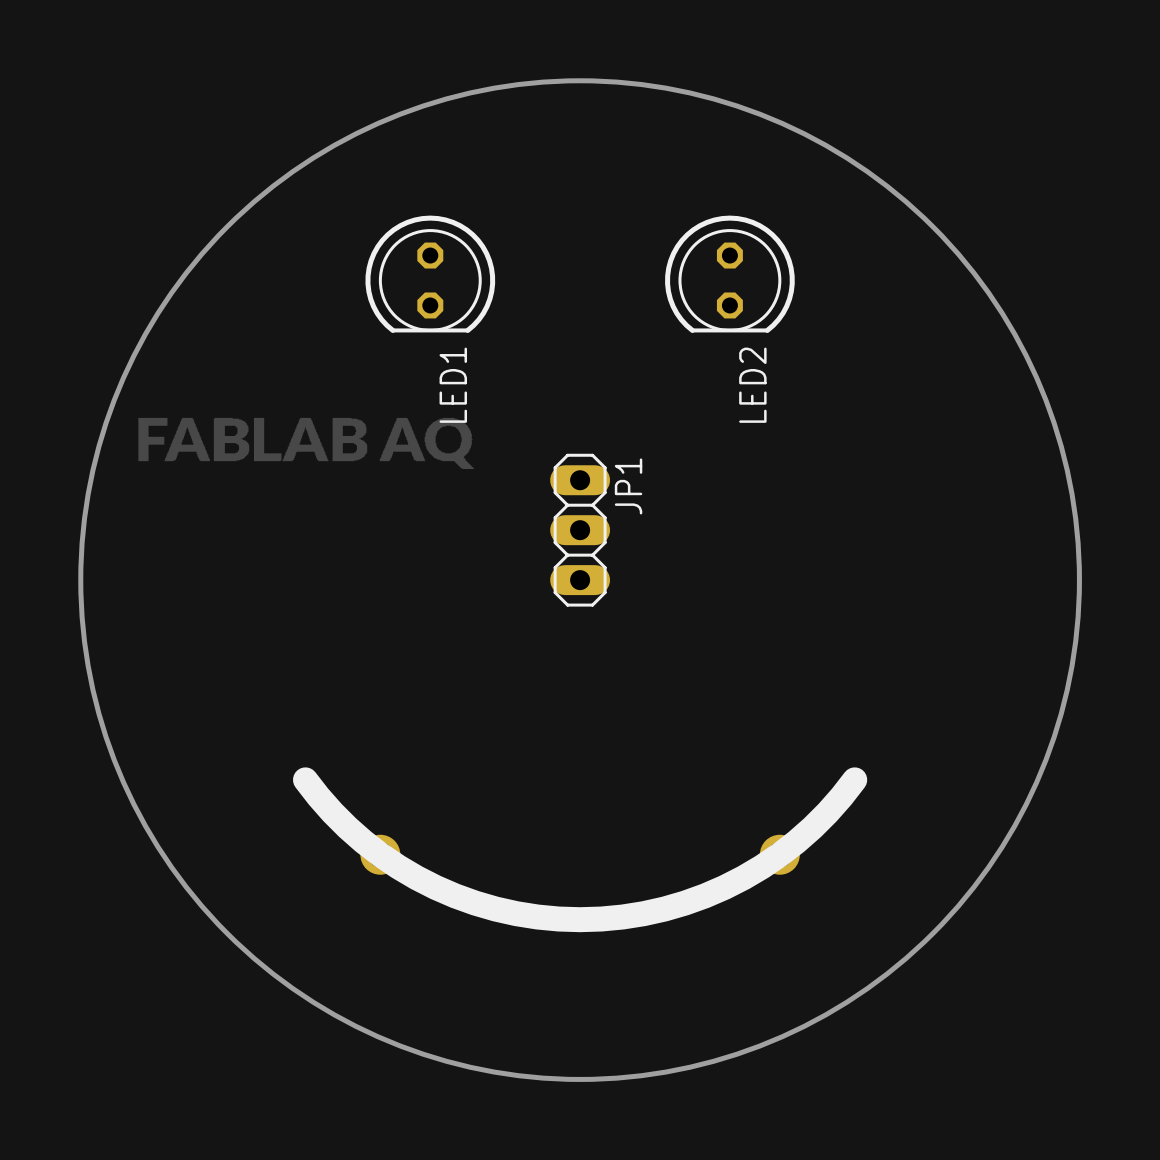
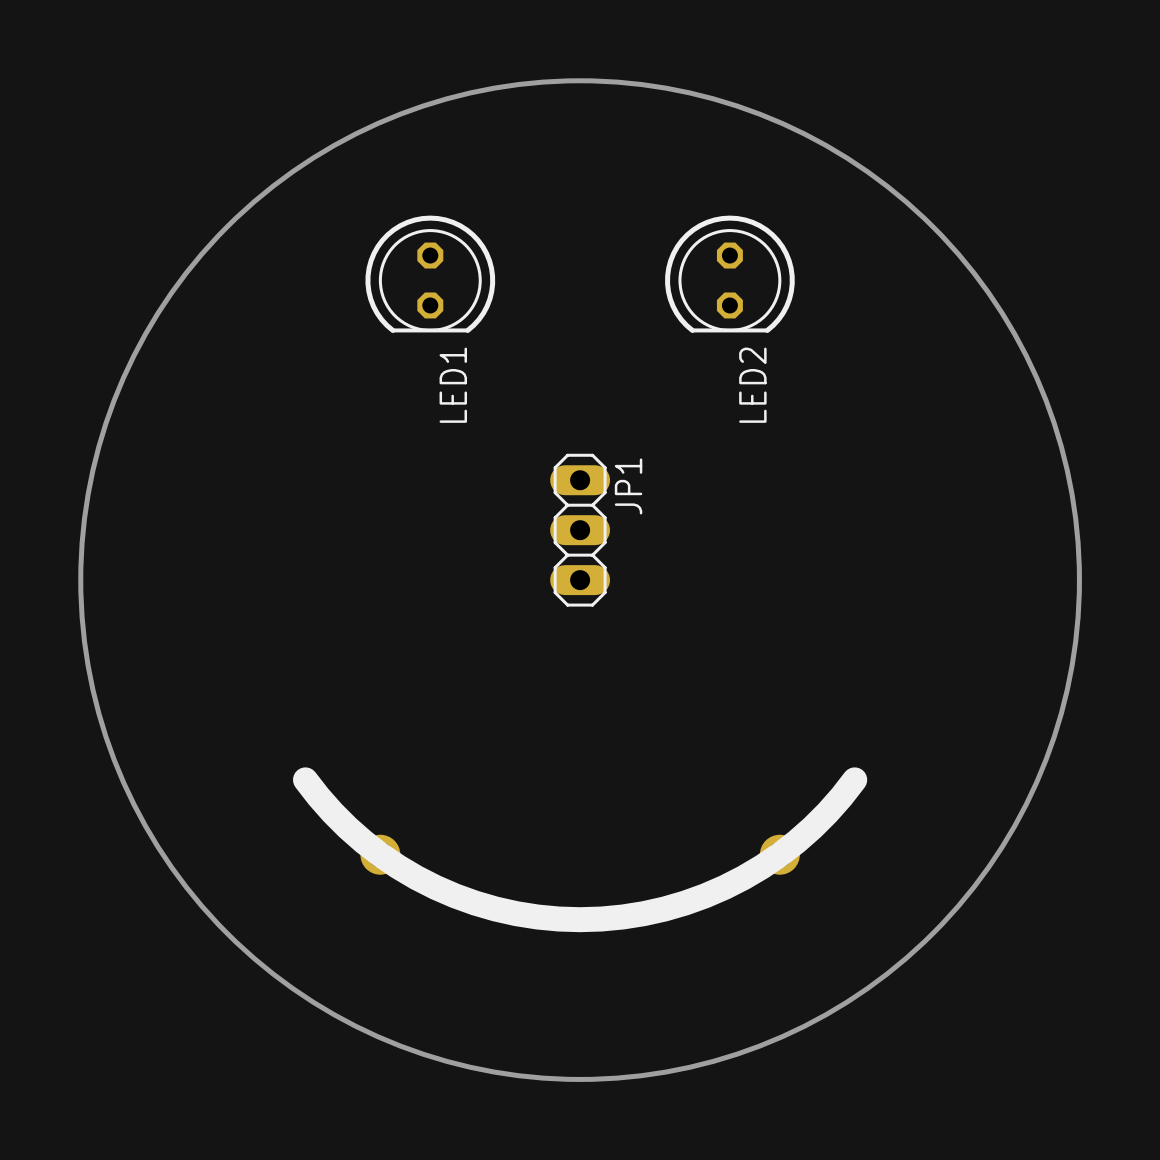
drawing: [138, 417, 475, 470] -> none

